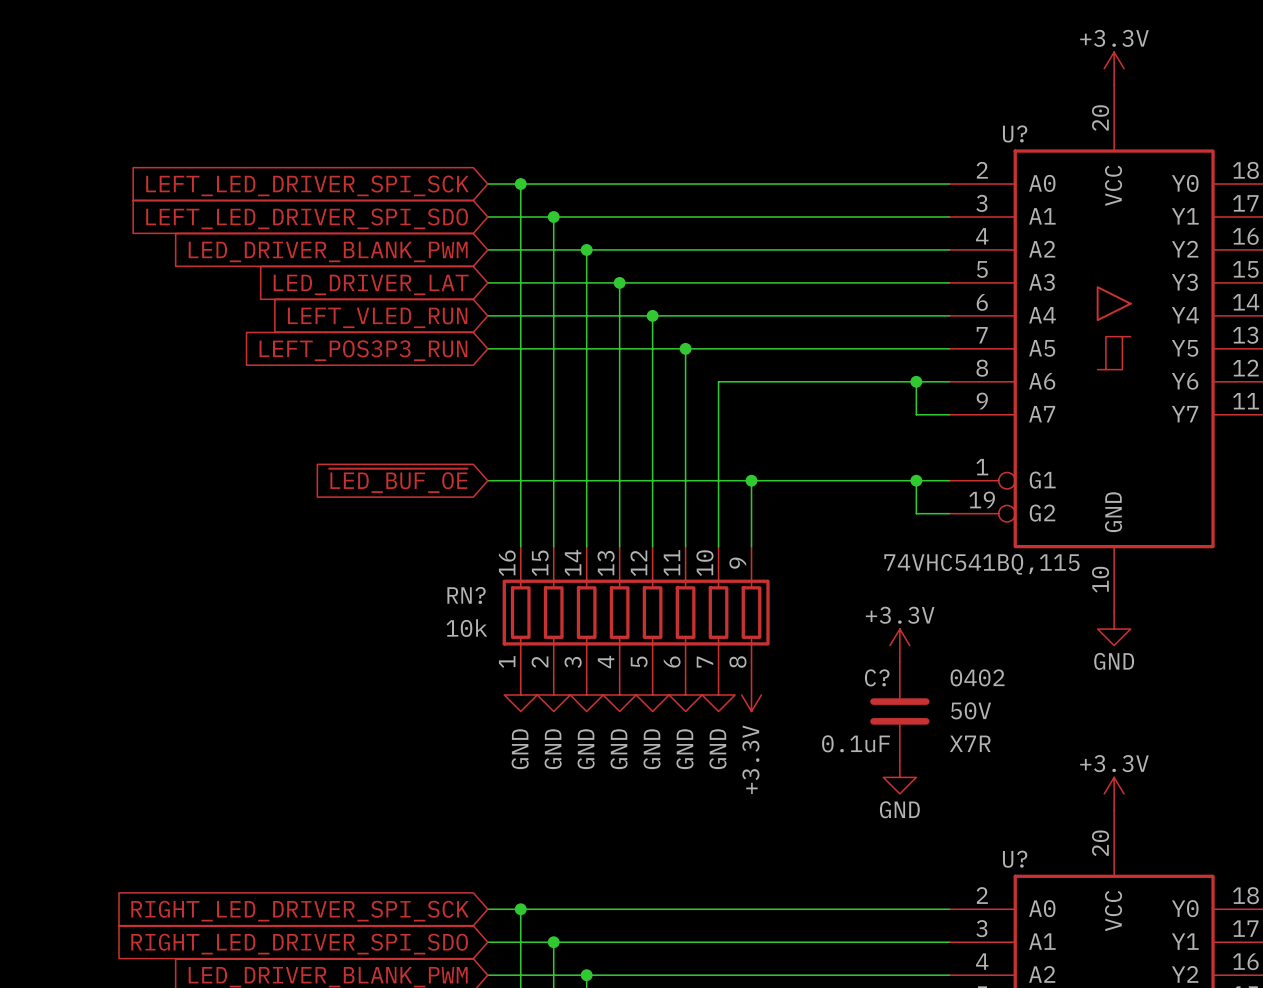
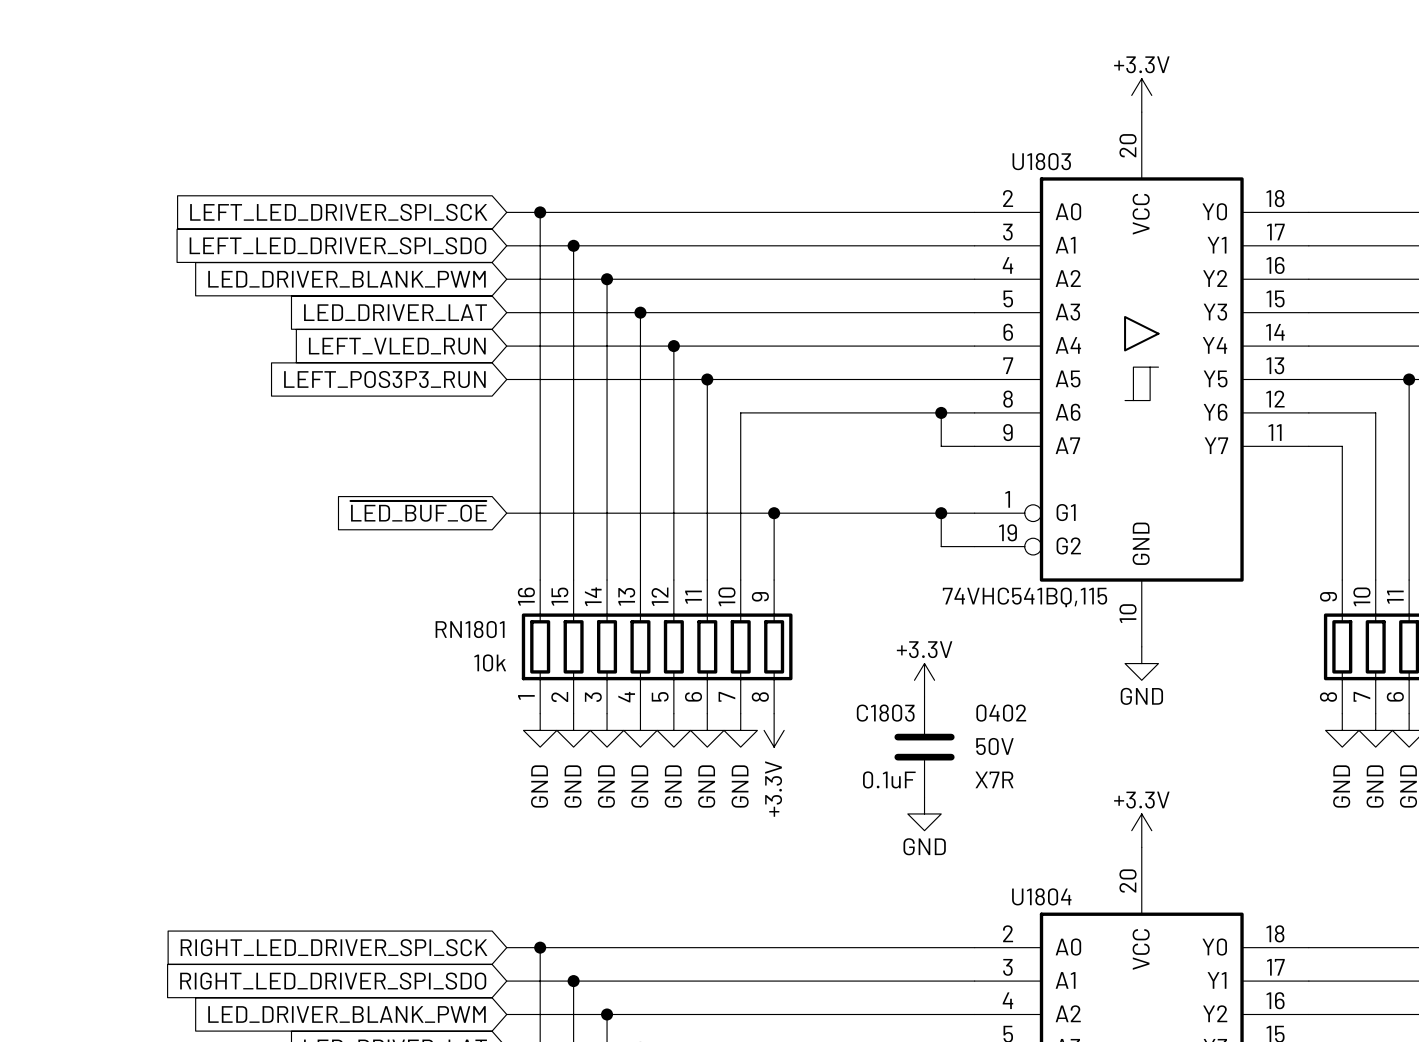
U? name: U? (1015, 133) -> U1803 (1041, 161)
RN? name: RN? (466, 595) -> RN1801 (470, 629)
C? name: C? (877, 677) -> C1803 (885, 713)
U? name: U? (1015, 859) -> U1804 (1041, 896)

